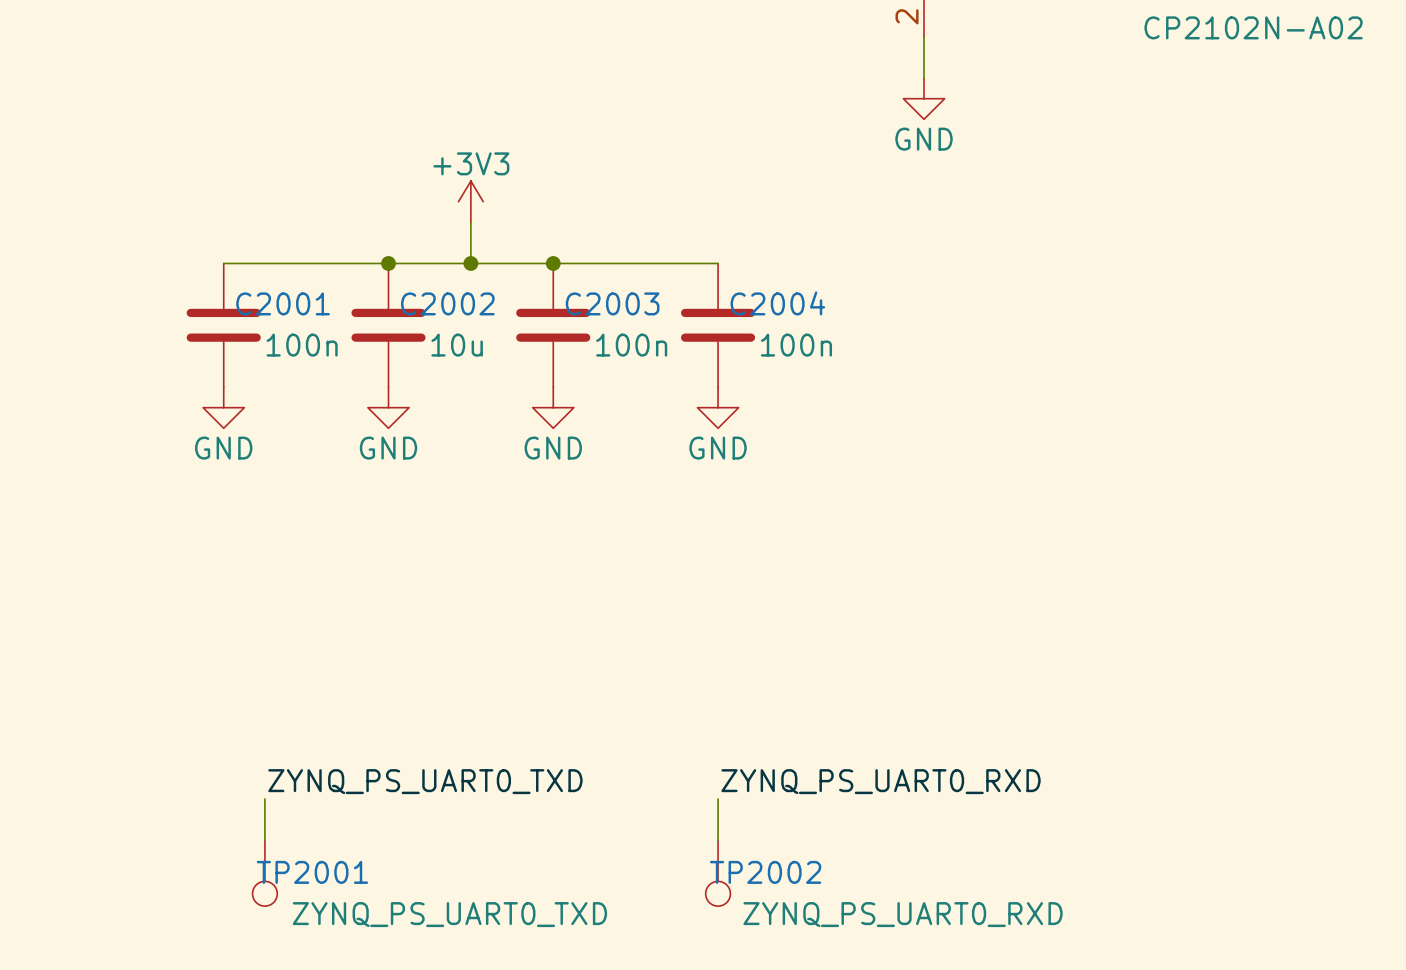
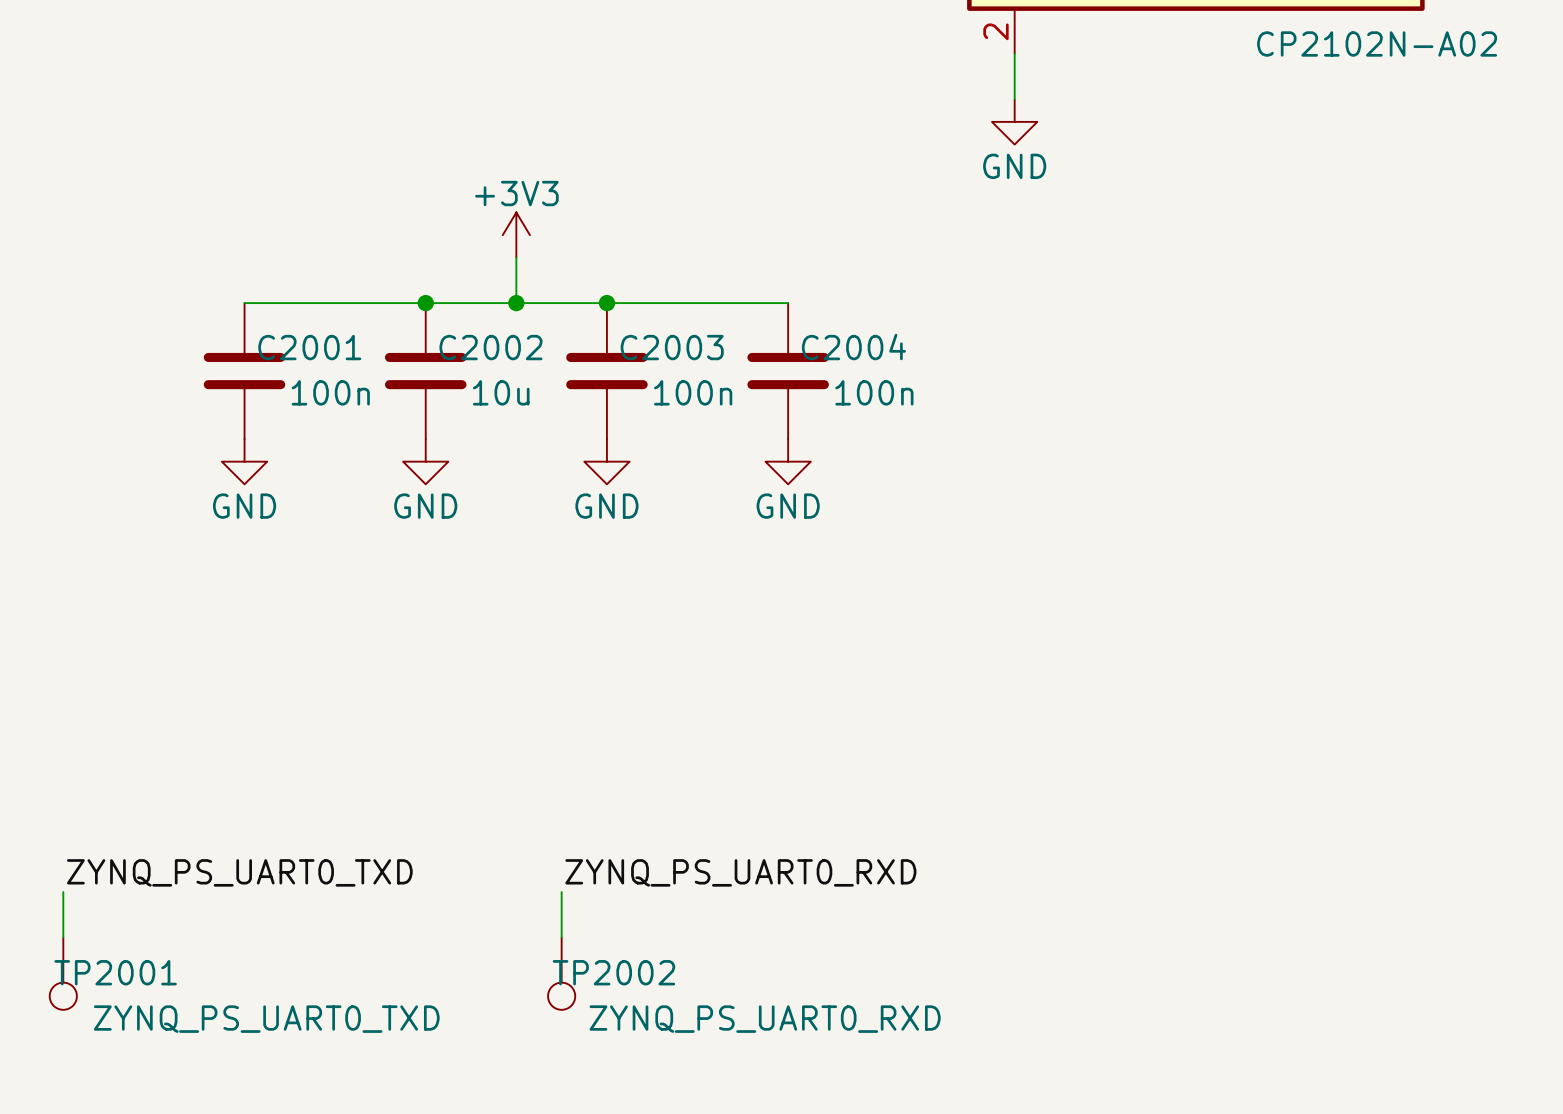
label position: ZYNQ_PS_UART0_TXD (425, 781) -> ZYNQ_PS_UART0_TXD (239, 872)
label position: ZYNQ_PS_UART0_RXD (881, 781) -> ZYNQ_PS_UART0_RXD (740, 872)
wire: (264, 799) (264, 840) -> (63, 892) (63, 937)
wire: (718, 799) (718, 840) -> (561, 892) (561, 937)
TP2001 position: (264, 873) -> (63, 973)
TP2002 position: (718, 873) -> (561, 973)

